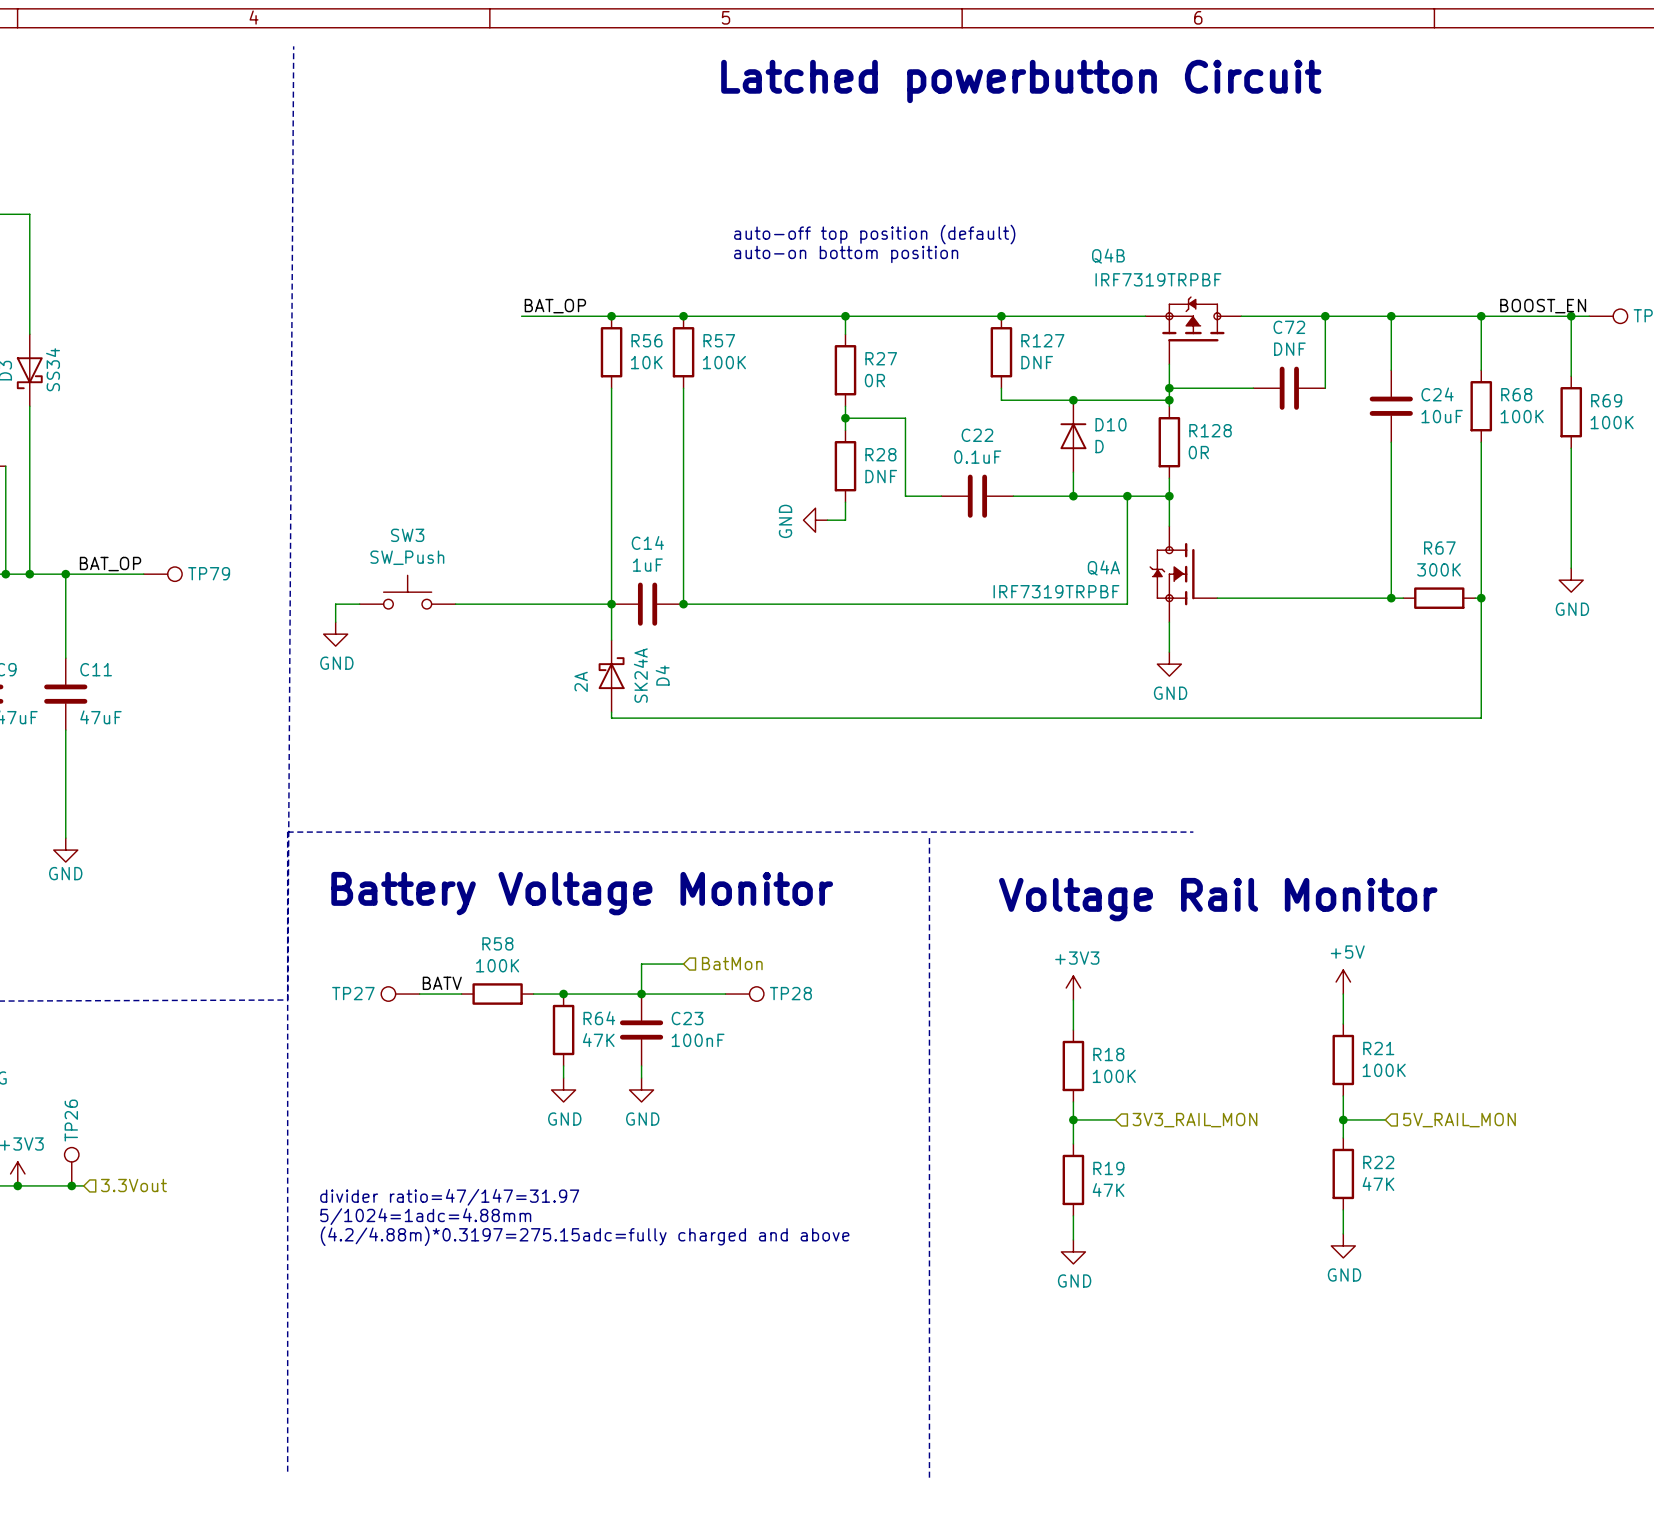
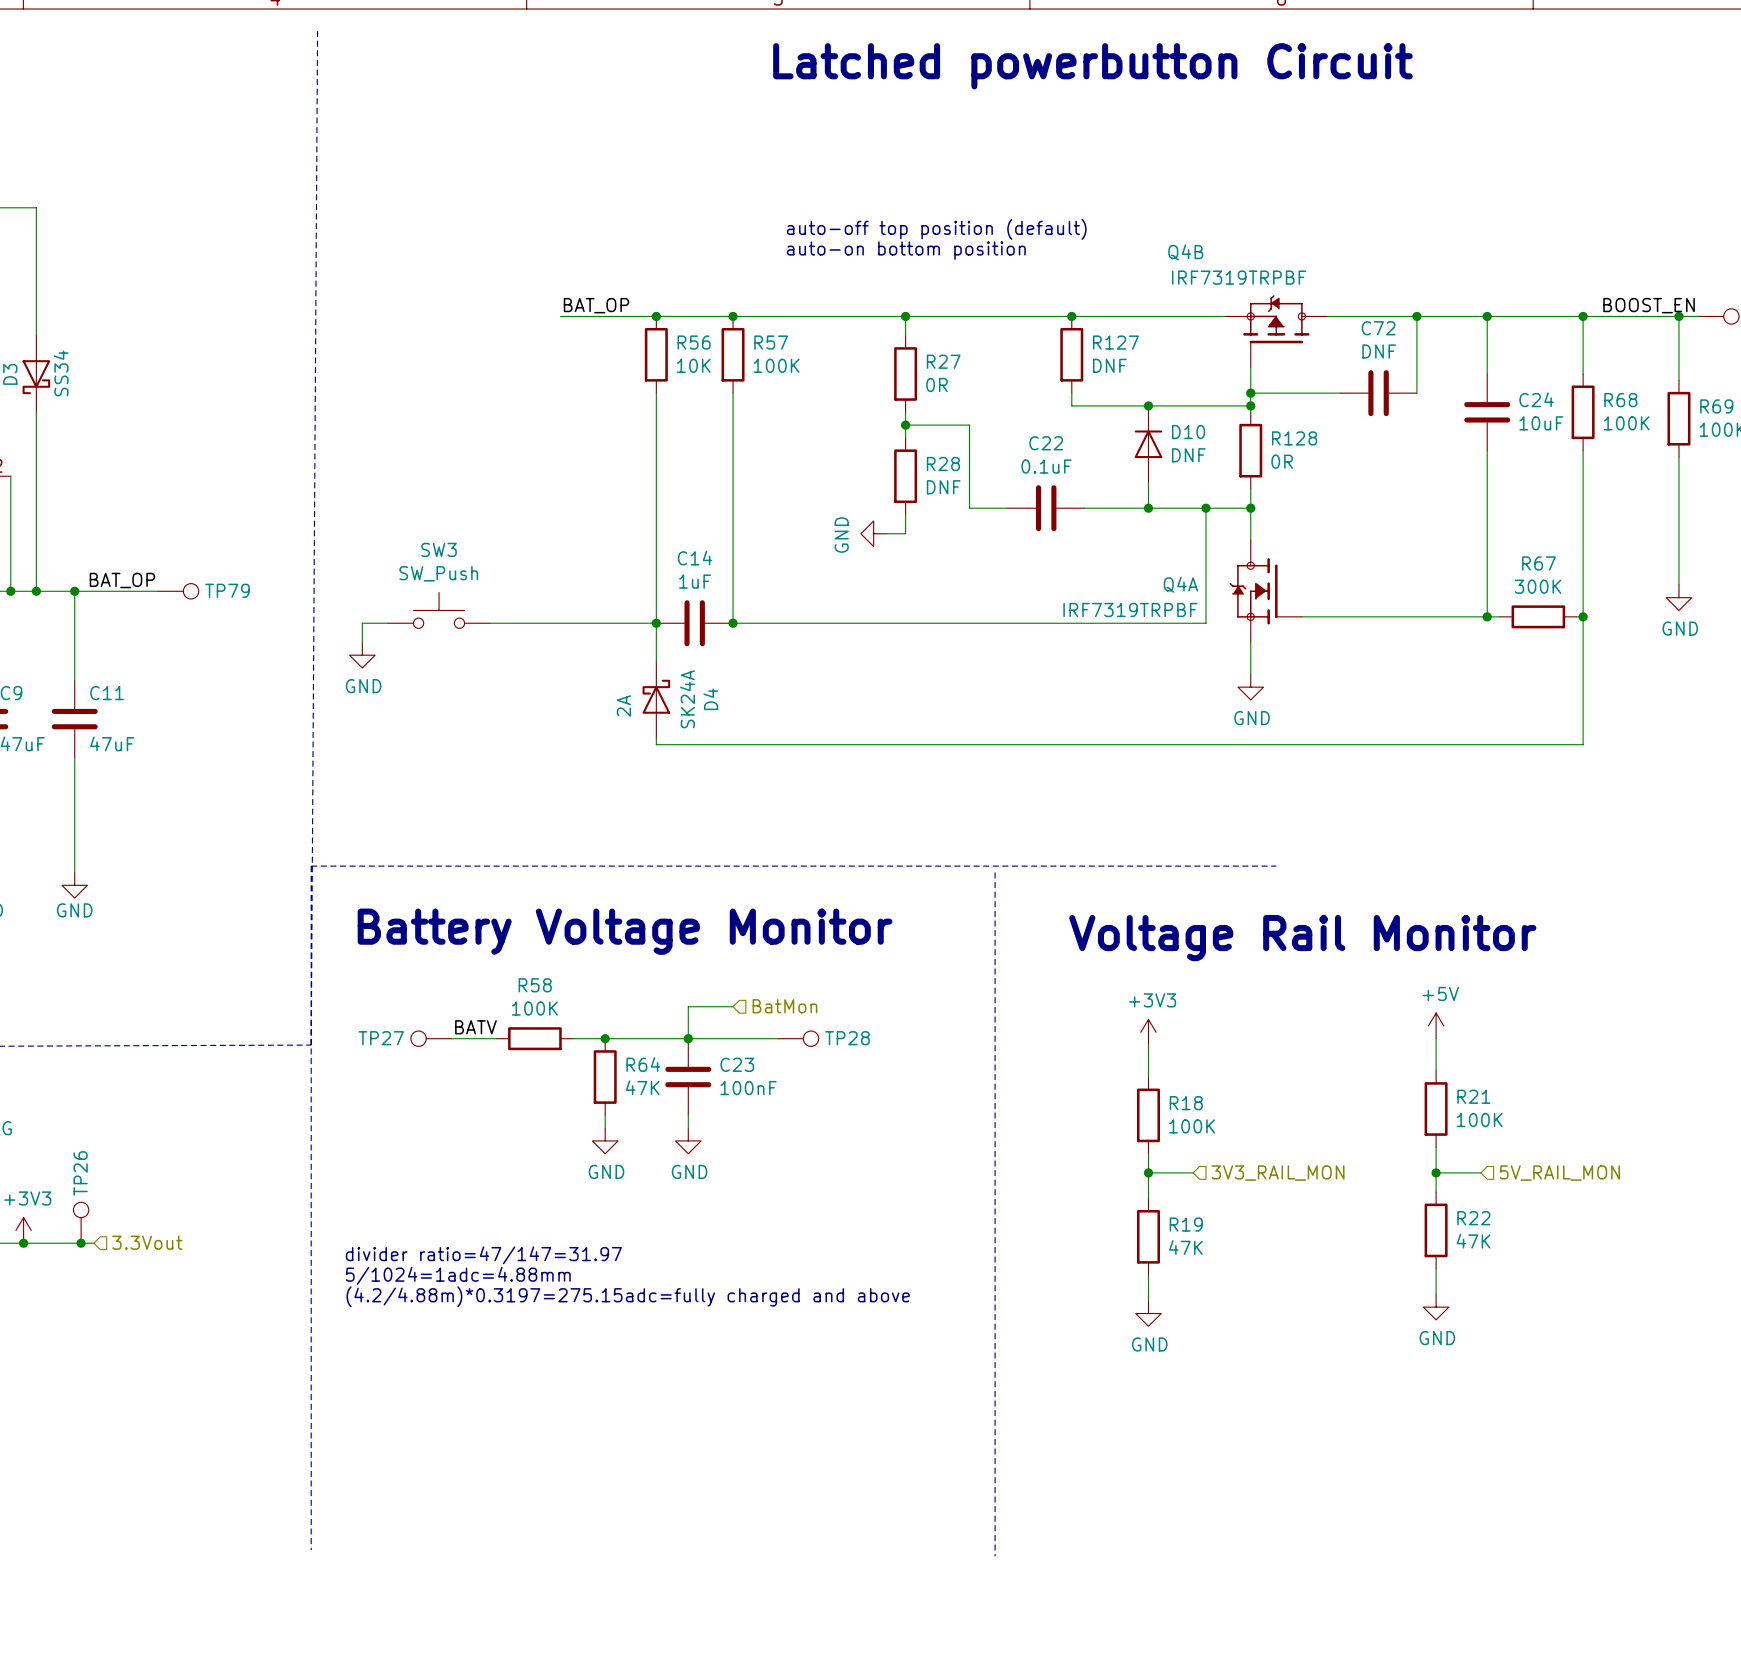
D10 value: D (1099, 446) -> DNF (1188, 455)

